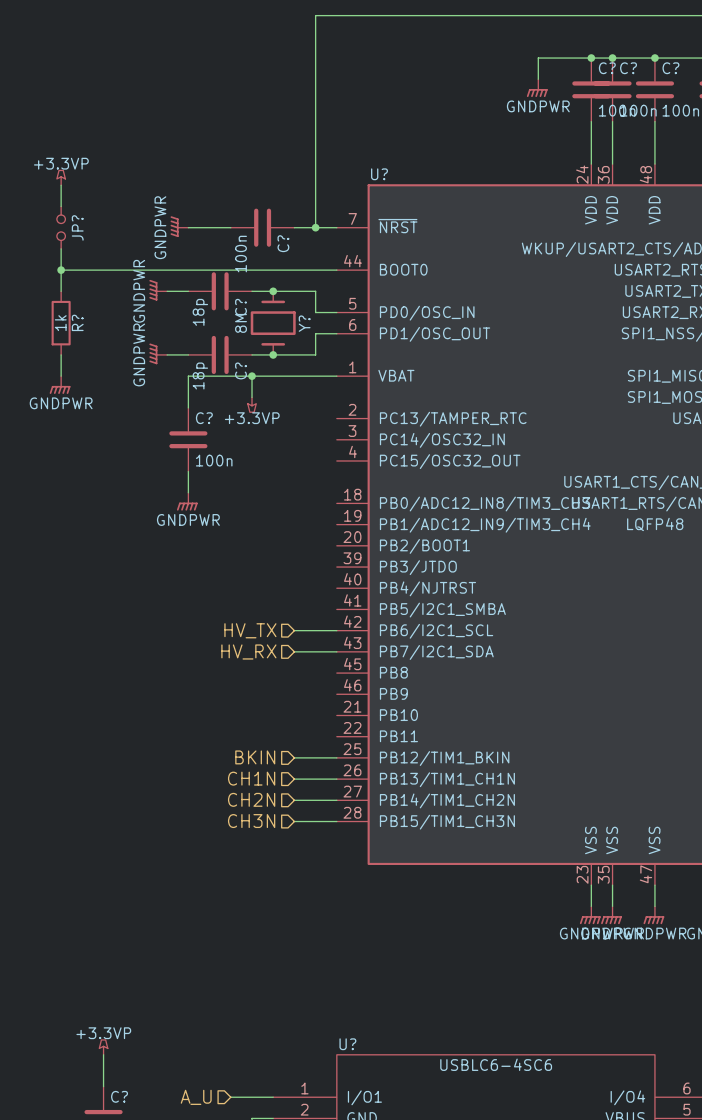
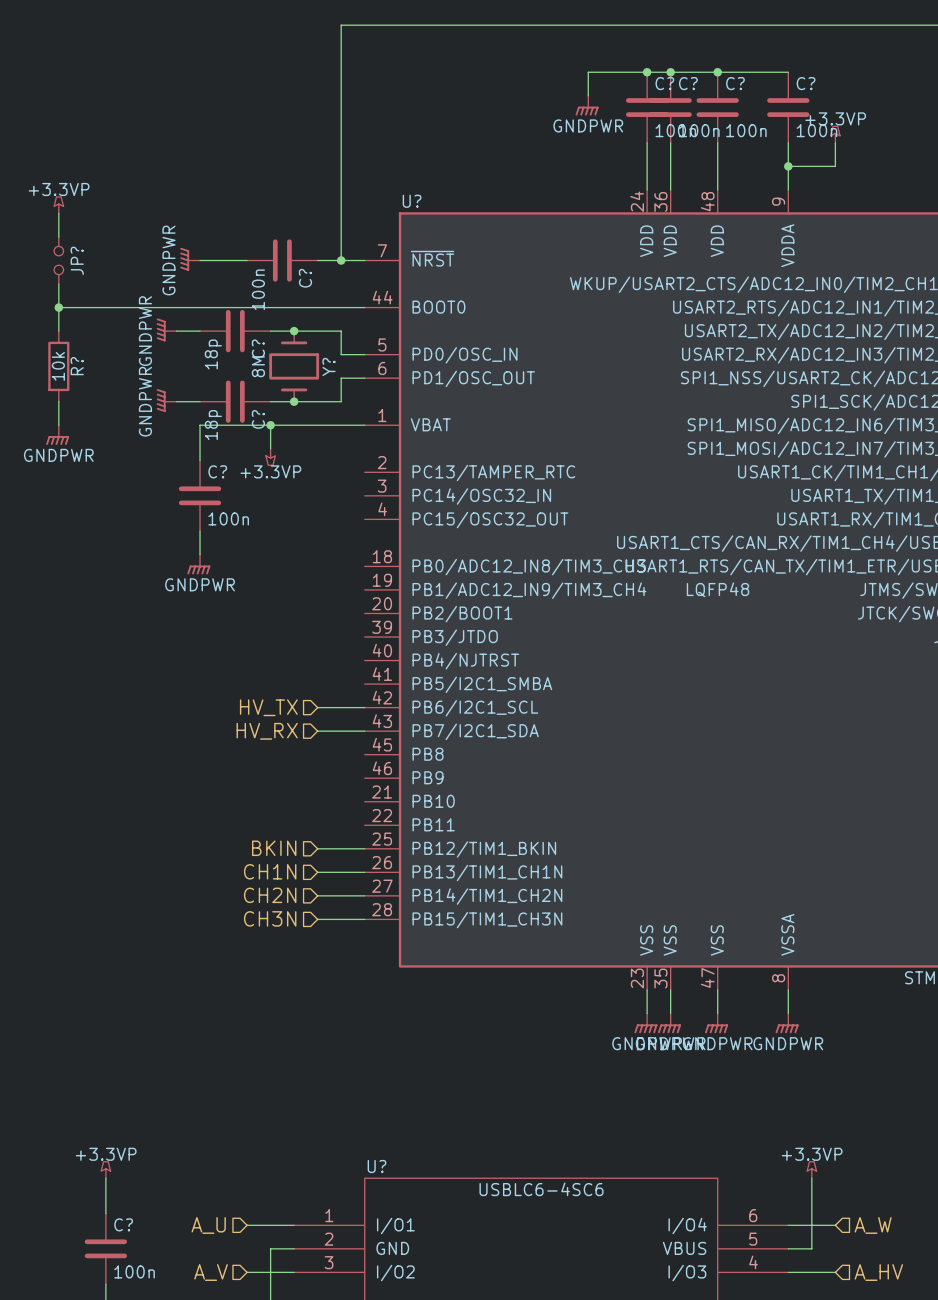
R? value: 1k (60, 323) -> 10k (58, 366)

